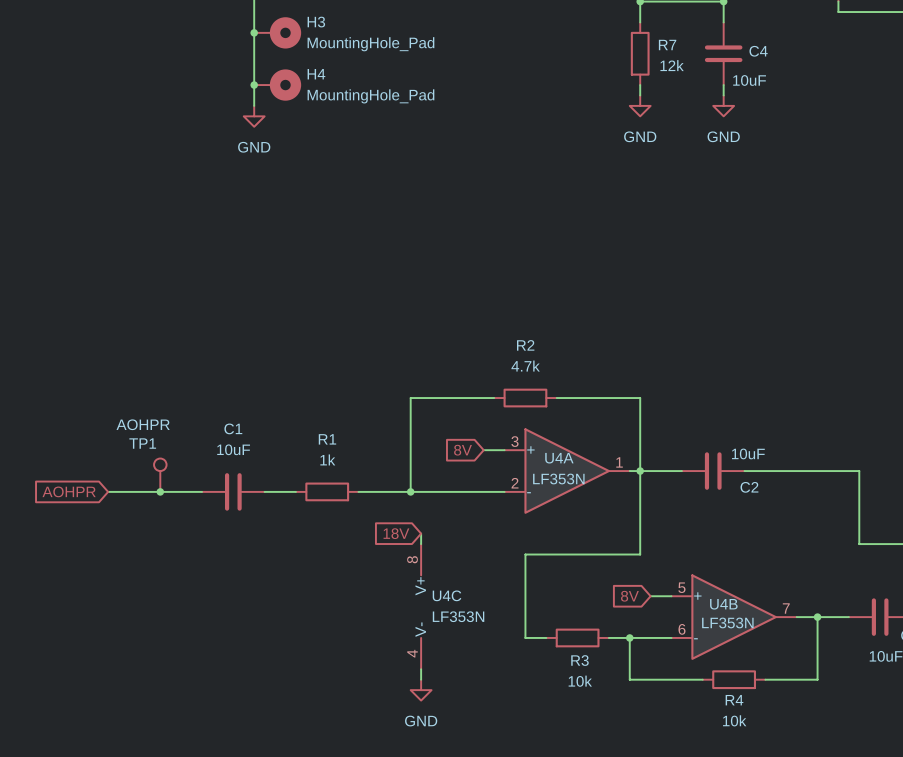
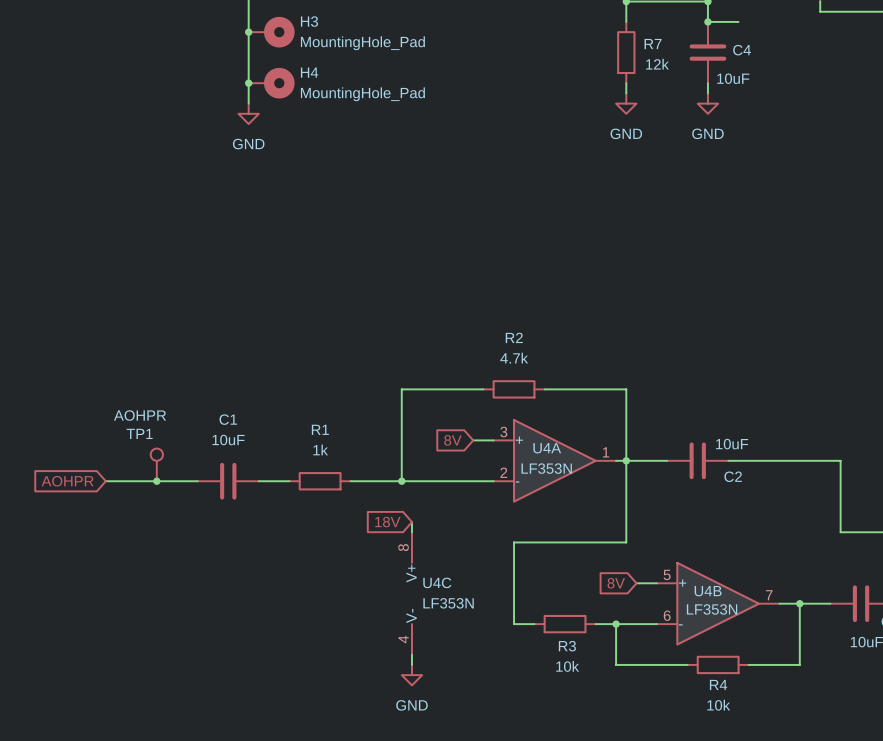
wire: none -> (707, 21) (738, 21)
junction: none -> (707, 21)

